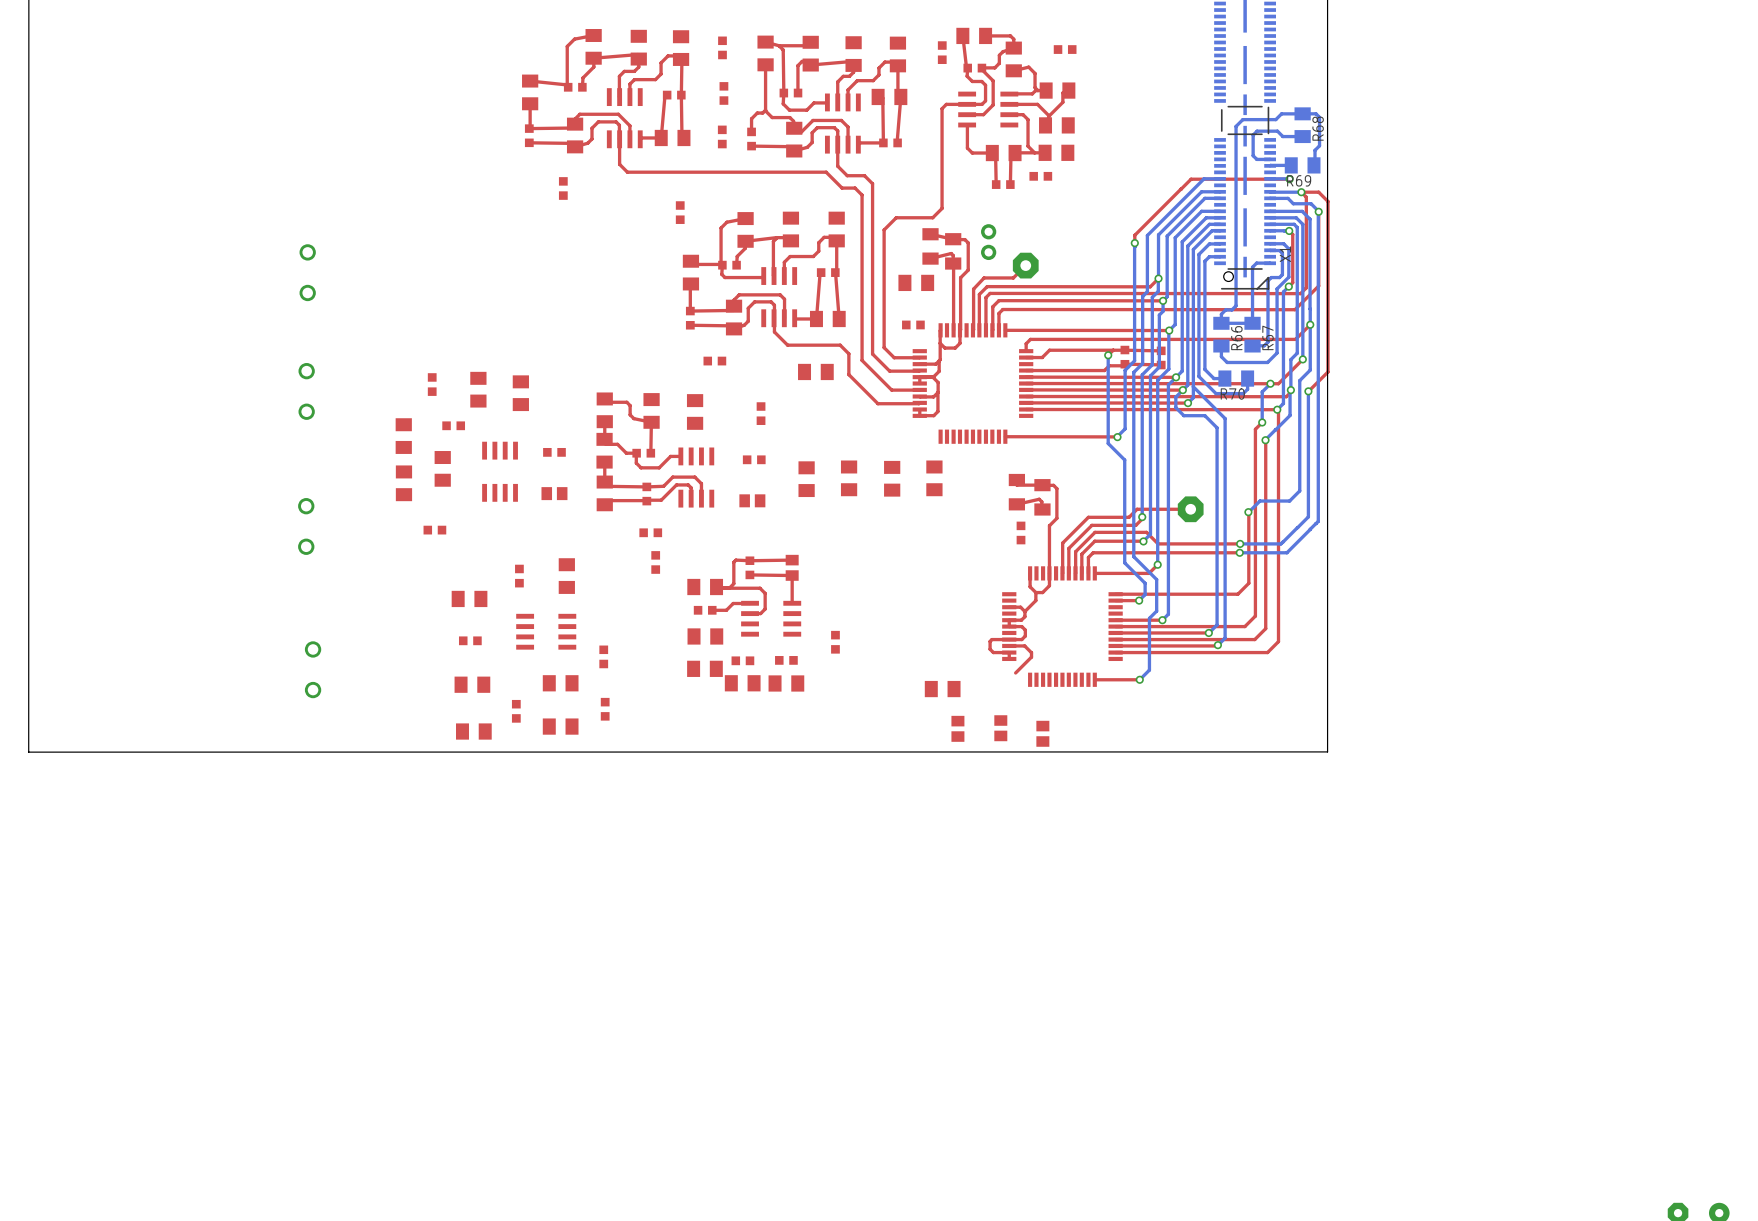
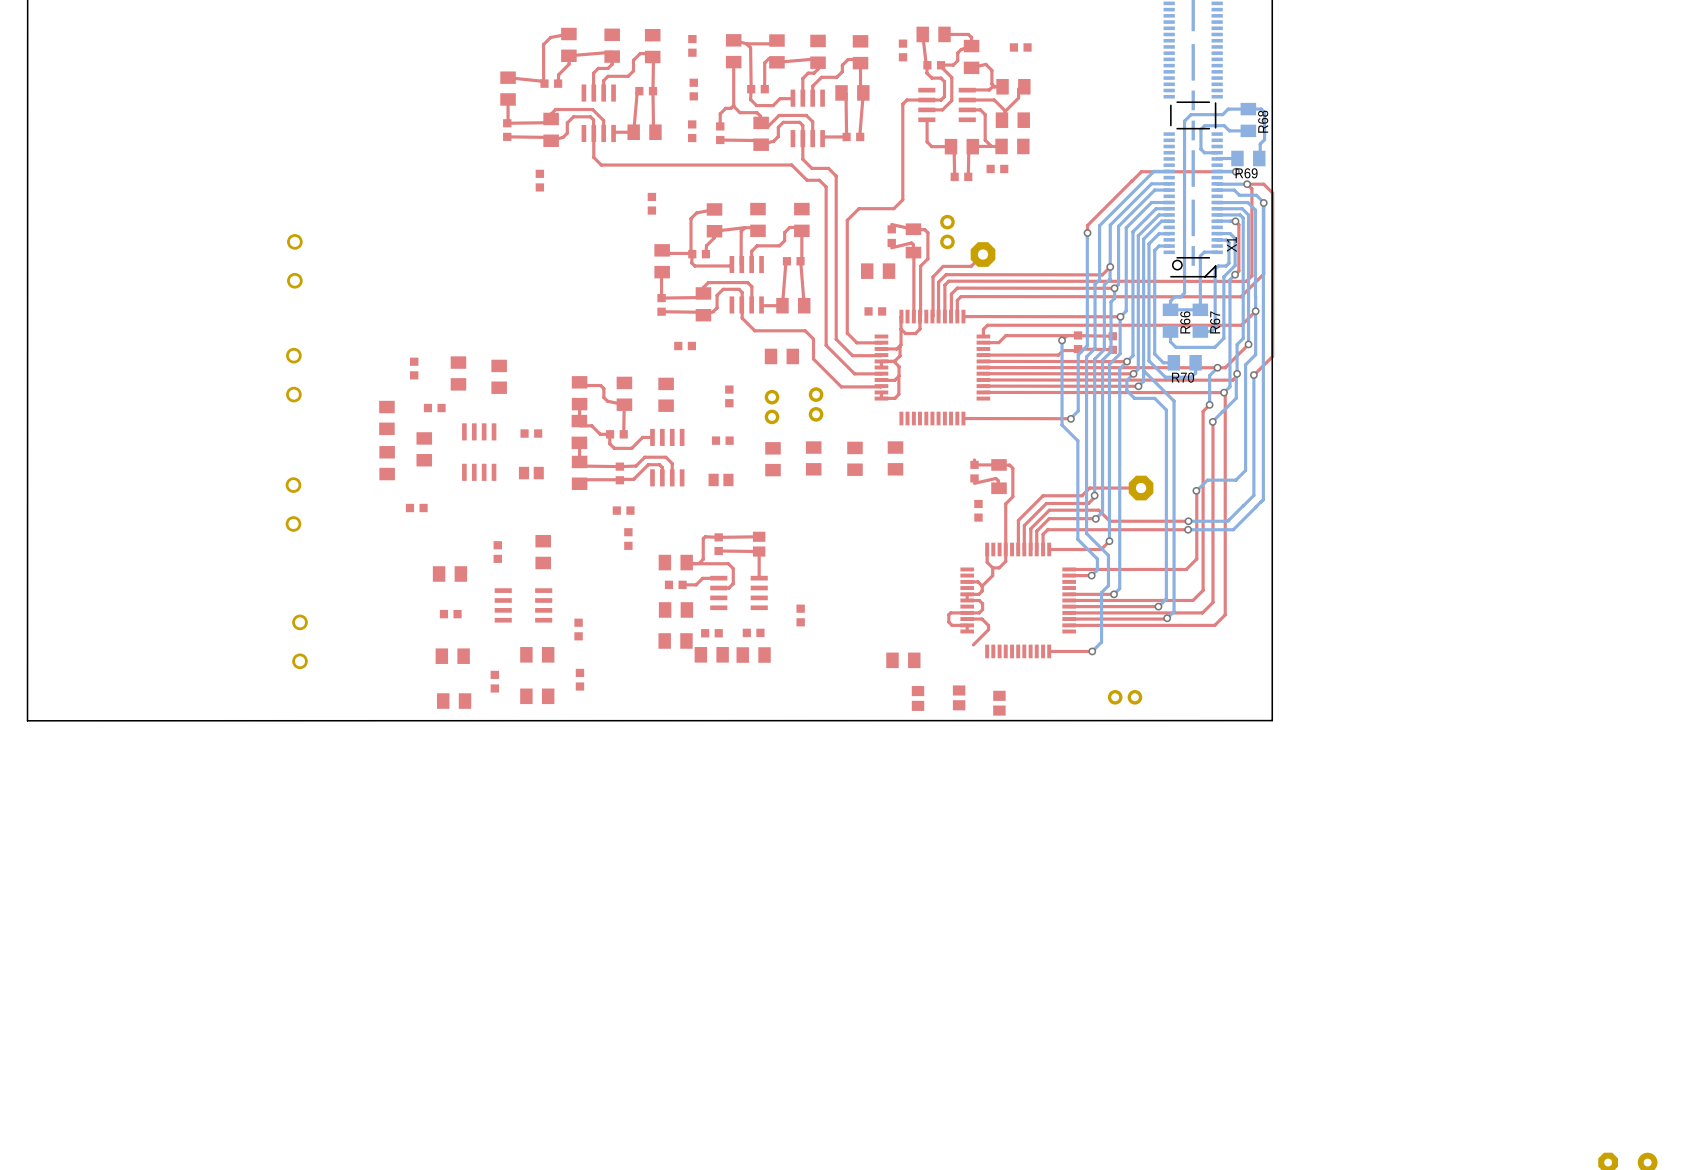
part footprint: [922, 228, 939, 265] -> [887, 225, 896, 248]
part: none -> (816, 404)
part: none -> (772, 407)
part footprint: [1008, 473, 1026, 511] -> [970, 460, 979, 483]
part: none -> (1125, 697)

